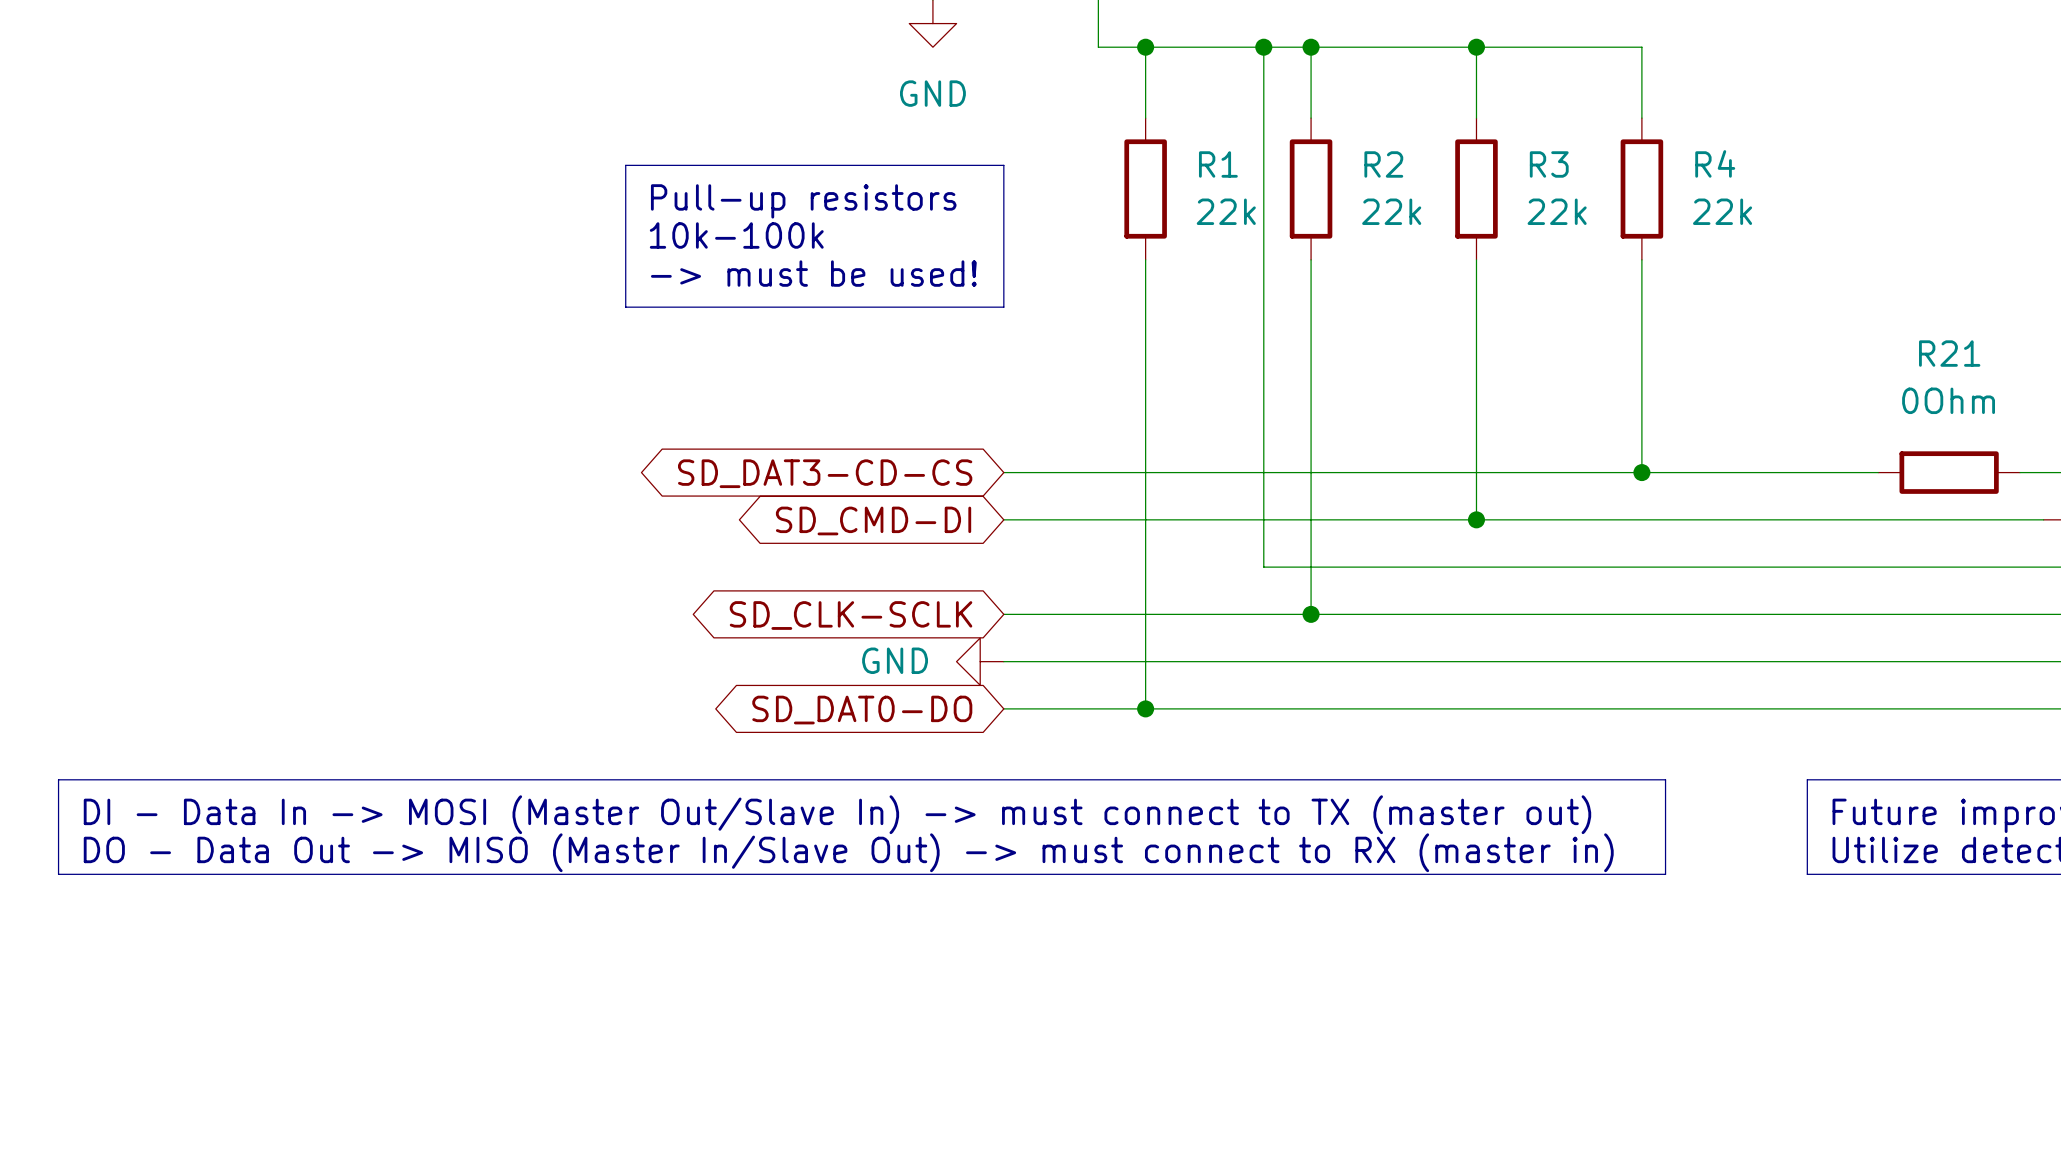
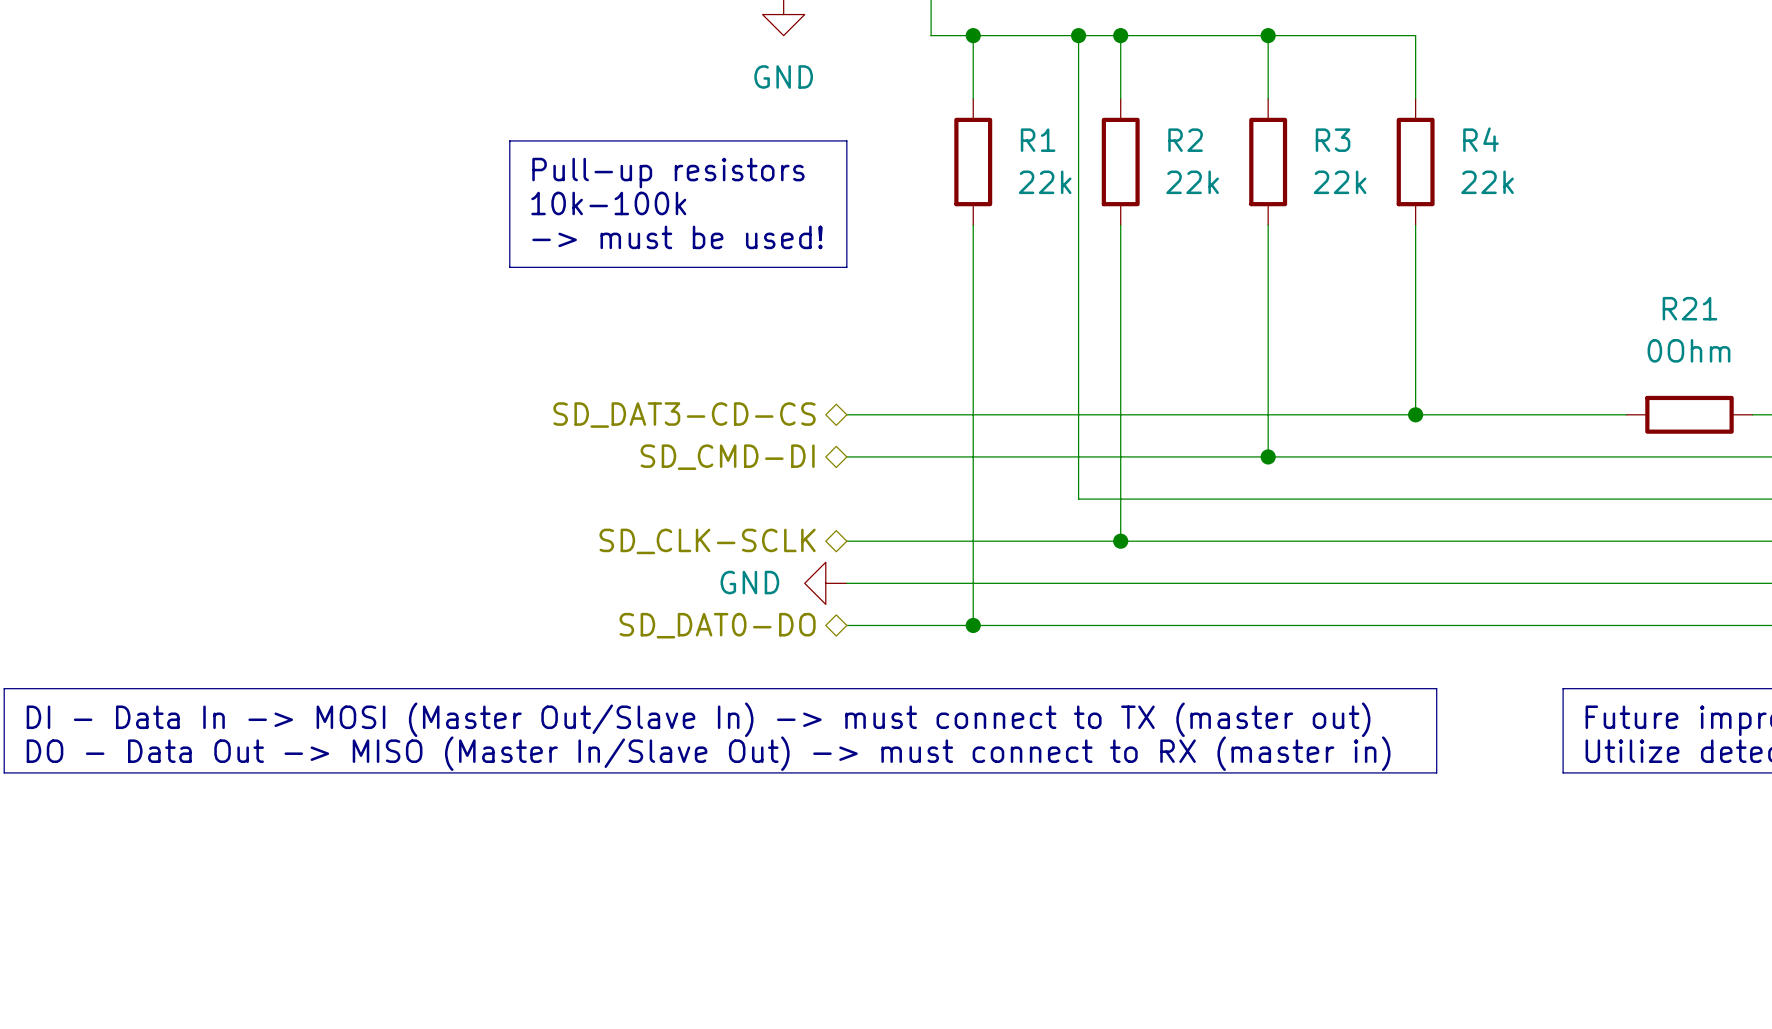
hierarchical label: none -> SD_DAT3-CD-CS (684, 415)
global label: SD_DAT3-CD-CS (825, 473) -> none
hierarchical label: none -> SD_CMD-DI (727, 457)
global label: SD_CMD-DI (873, 520) -> none
hierarchical label: none -> SD_CLK-SCLK (707, 541)
global label: SD_CLK-SCLK (851, 615) -> none
hierarchical label: none -> SD_DAT0-DO (717, 625)
global label: SD_DAT0-DO (862, 710) -> none

